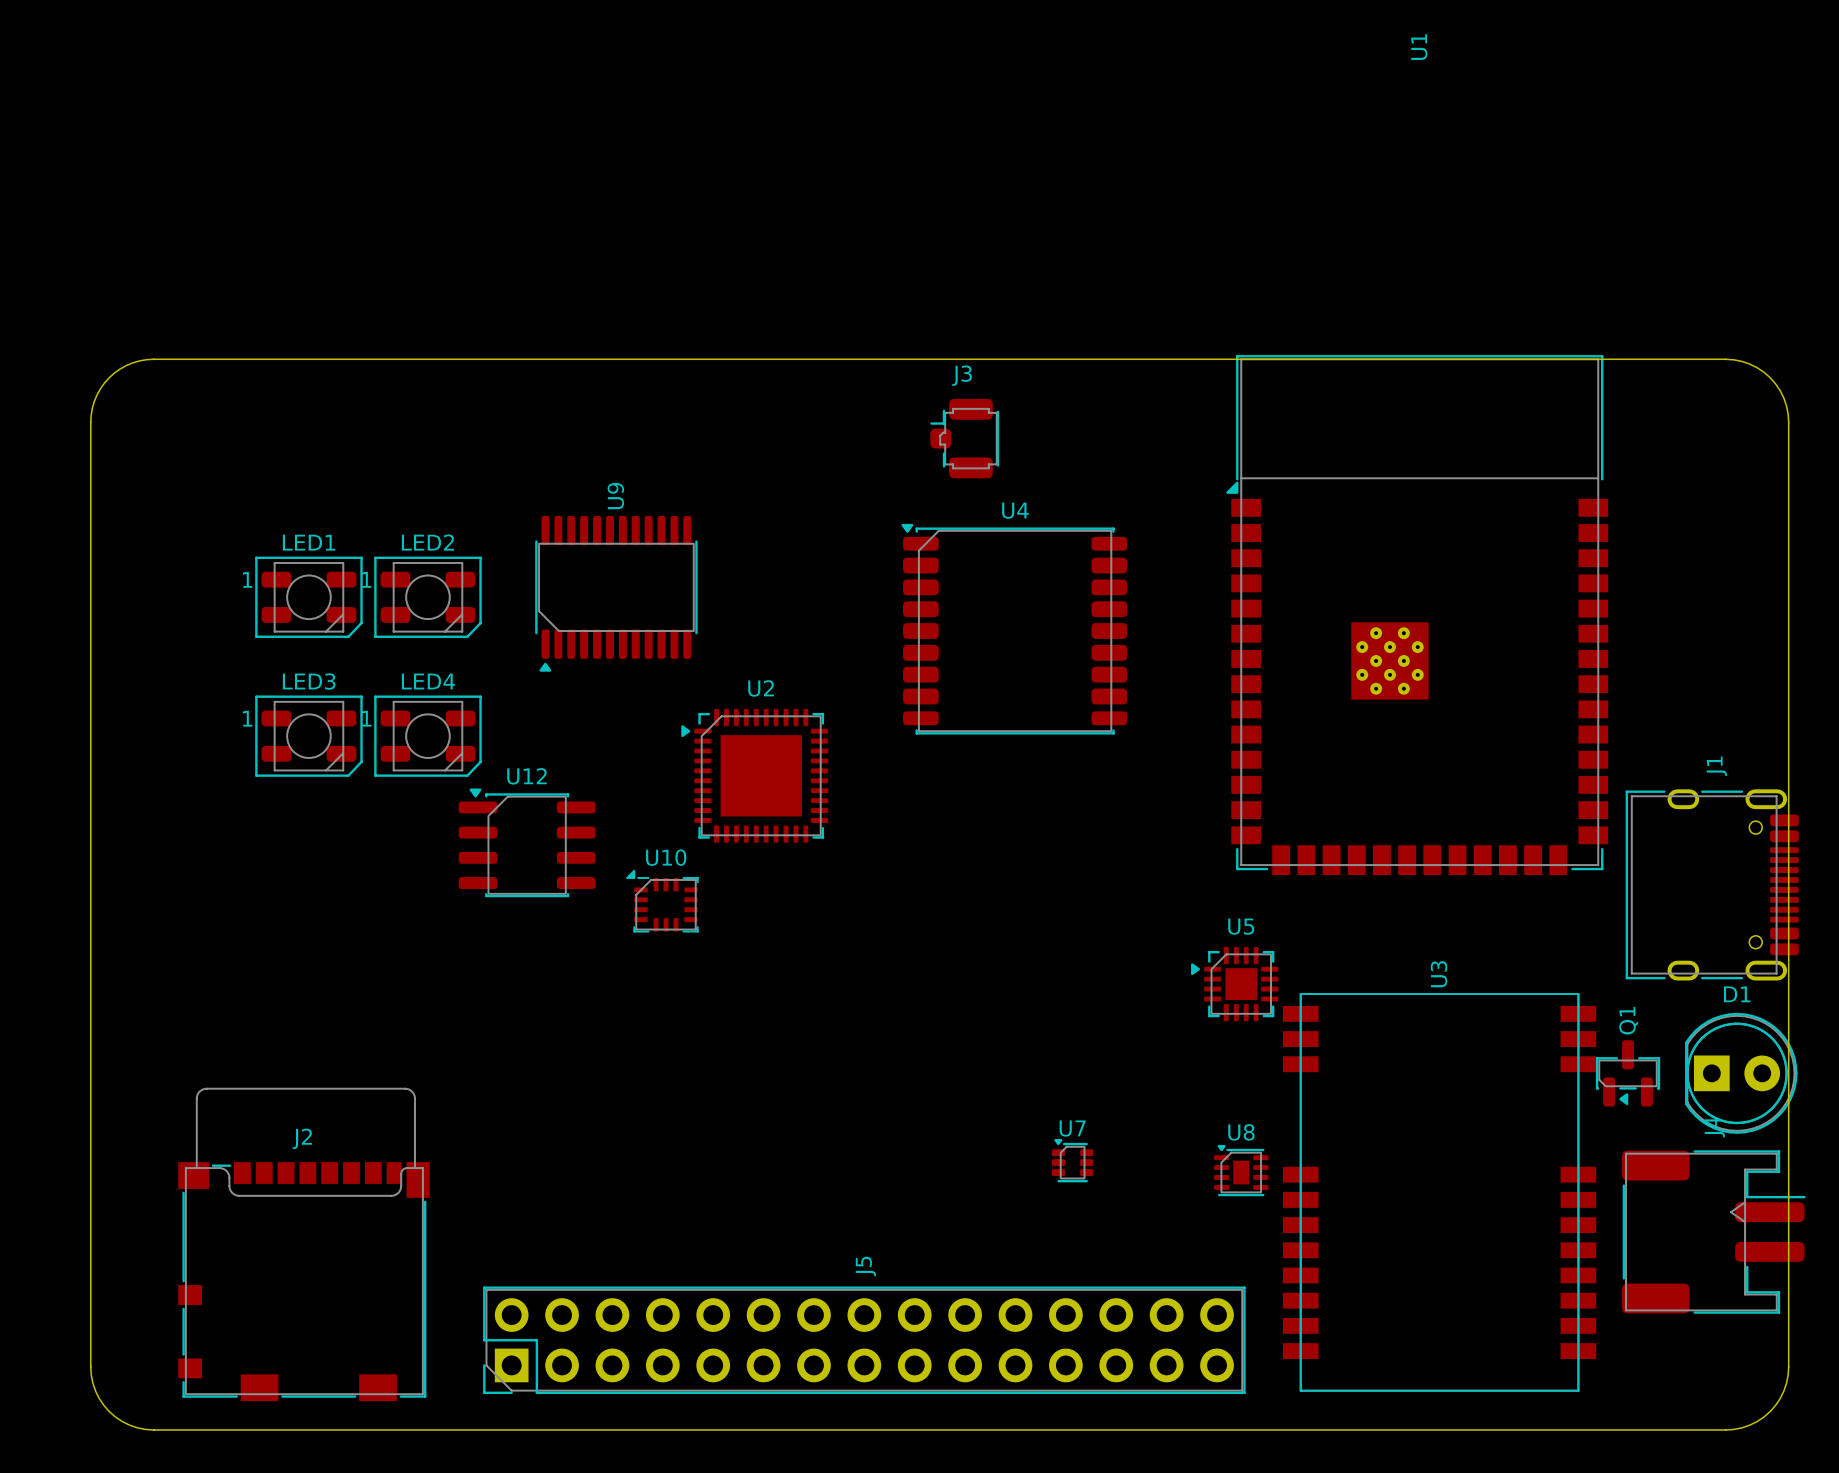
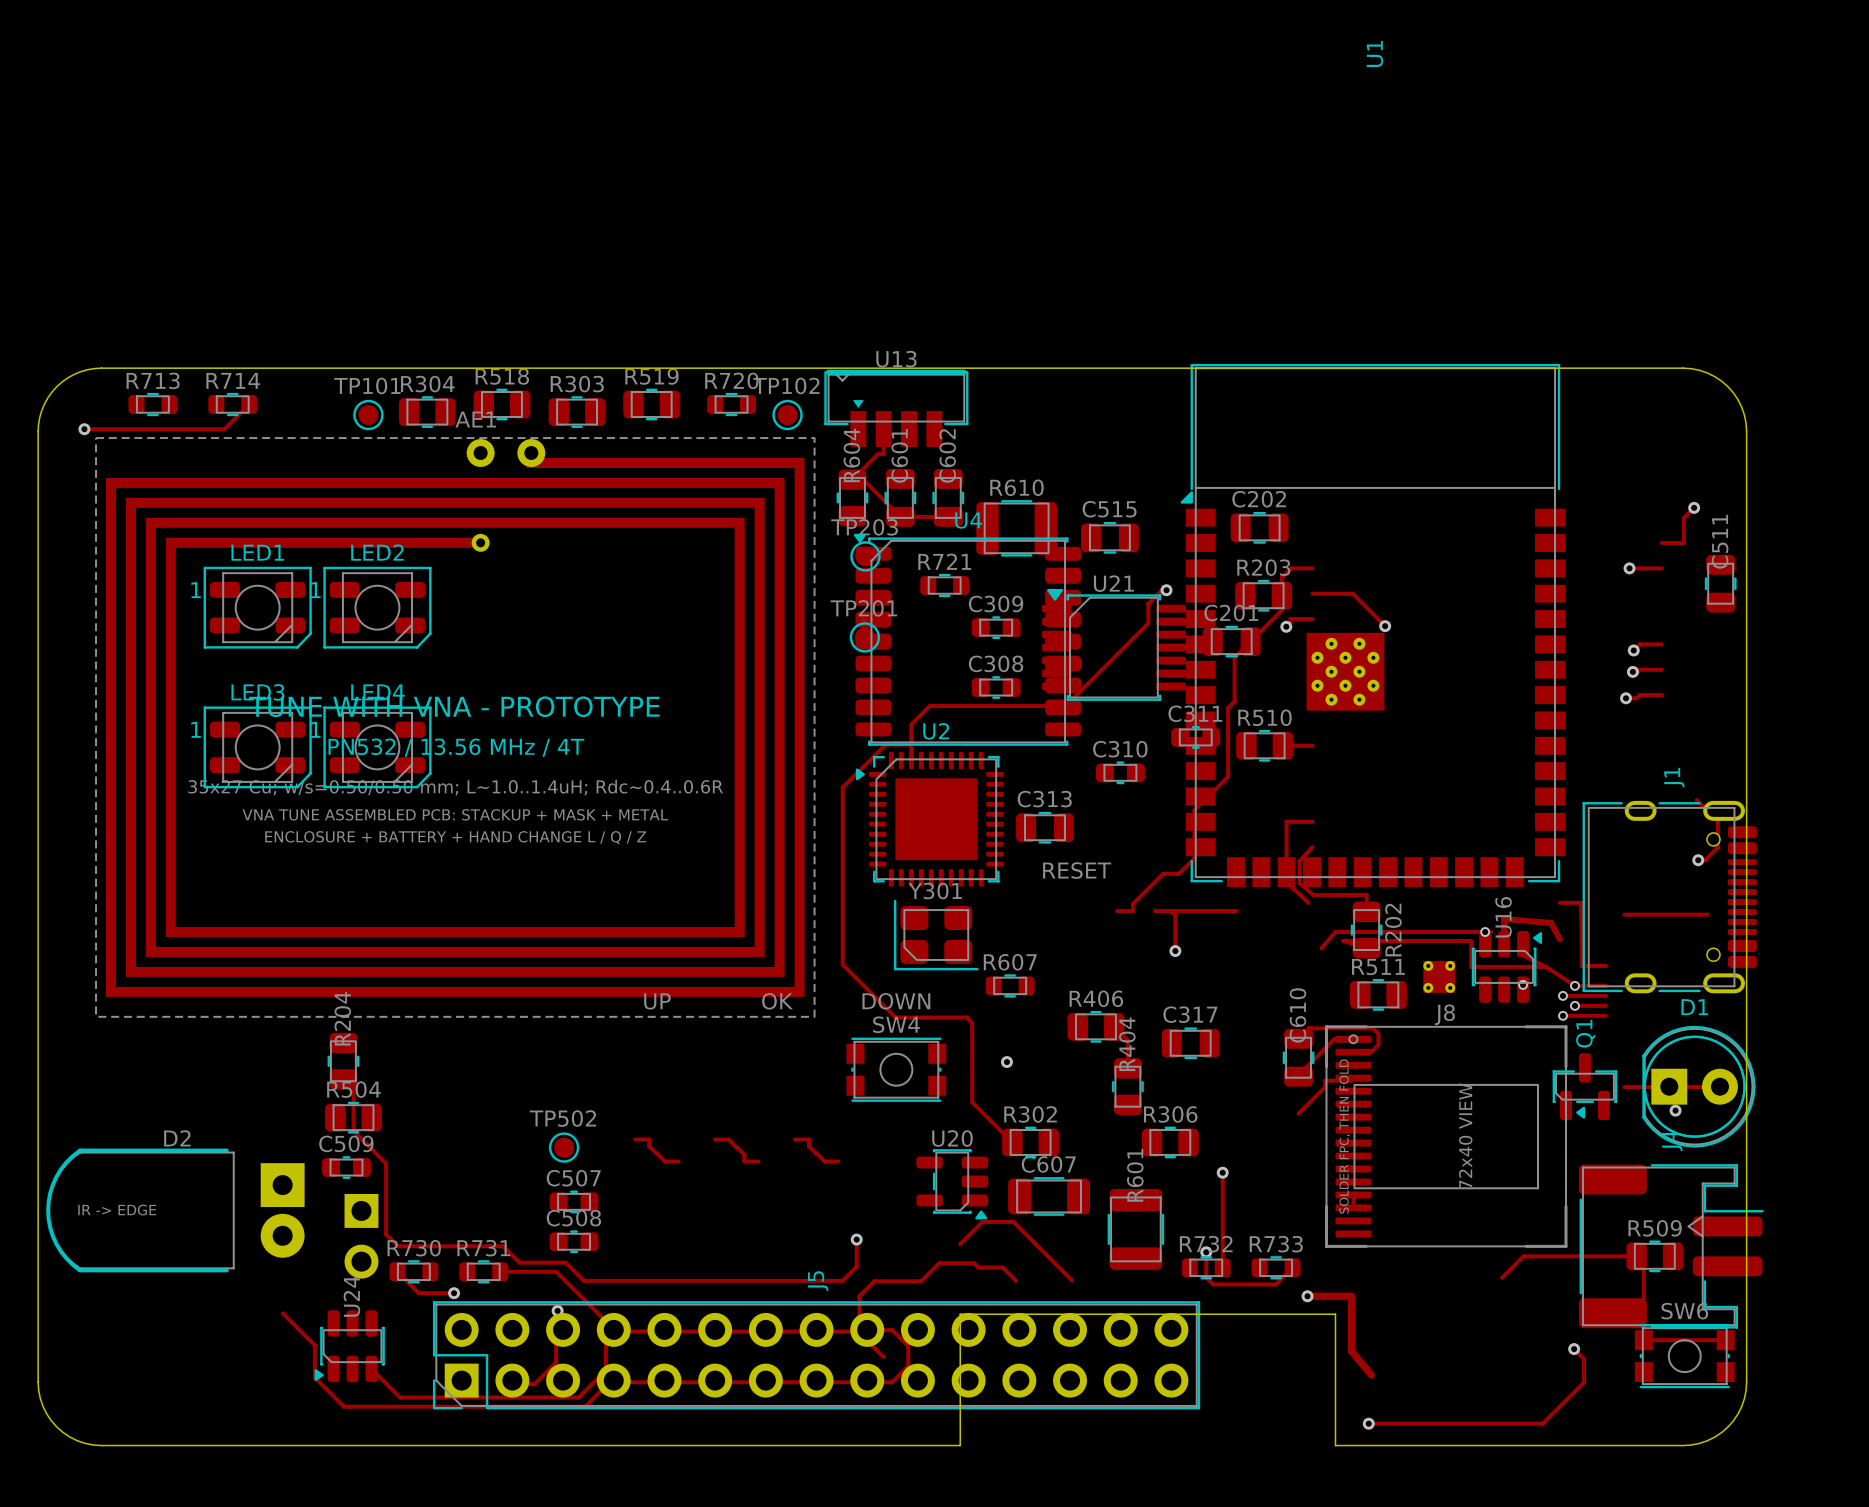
R713: none -> (152, 404)
R714: none -> (232, 404)
track: none -> (249, 404) (224, 429) (84, 429)
R518: none -> (501, 404)
R519: none -> (651, 404)
R720: none -> (731, 404)
U13: none -> (896, 408)
R304: none -> (427, 412)
R303: none -> (577, 412)
TP101: none -> (368, 415)
TP102: none -> (787, 415)
via: none -> (84, 429)
track: none -> (883, 429) (883, 454) (878, 454) (852, 479) (863, 479) (900, 516) (948, 516)
J3: (964, 438) -> none
R604: none -> (852, 497)
C601: none -> (900, 497)
C602: none -> (948, 497)
track: none -> (1694, 507) (1683, 518) (1683, 543) (1661, 543)
via: none -> (1694, 507)
C202: none -> (1259, 527)
R610: none -> (1016, 528)
C515: none -> (1109, 537)
TP203: none -> (865, 556)
track: none -> (1291, 568) (1312, 568)
track: none -> (1291, 568) (1281, 577) (1281, 610) (1234, 657) (1234, 701) (1228, 708) (1228, 776) (1194, 810) (1194, 858) (1178, 873) (1163, 873) (1132, 904) (1132, 911) (1116, 911)
track: none -> (1629, 568) (1661, 568)
via: none -> (1629, 568)
C511: none -> (1720, 583)
R721: none -> (944, 585)
track: none -> (1166, 590) (1162, 590) (1148, 603) (1148, 623) (1065, 705) (929, 705) (911, 724) (911, 760)
via: none -> (1166, 590)
track: none -> (1312, 593) (1352, 593) (1385, 626)
R203: none -> (1263, 595)
U9: (616, 593) -> none
track: none -> (1312, 619) (1290, 619) (1290, 622) (1286, 626)
via: none -> (1385, 626)
via: none -> (1286, 626)
C309: none -> (996, 627)
TP201: none -> (864, 637)
C201: none -> (1231, 641)
track: none -> (1661, 644) (1639, 644) (1633, 650)
U21: none -> (1113, 644)
via: none -> (1633, 650)
track: none -> (1661, 669) (1639, 669) (1632, 671)
via: none -> (1632, 671)
C308: none -> (996, 687)
track: none -> (1661, 695) (1639, 695) (1636, 698) (1626, 698)
via: none -> (1626, 698)
AE1: none -> (455, 727)
C311: none -> (1195, 737)
track: none -> (911, 744) (885, 744) (842, 787) (842, 964) (895, 1017) (966, 1017) (972, 1022) (972, 1102) (1012, 1142)
R510: none -> (1264, 745)
track: none -> (1282, 745) (1312, 745)
C310: none -> (1120, 772)
U2 position: (754, 775) -> (929, 819)
track: none -> (1696, 800) (1717, 821) (1717, 847) (1705, 860) (1698, 860)
track: none -> (1312, 821) (1286, 821) (1286, 883) (1308, 903)
C313: none -> (1044, 827)
track: none -> (1312, 847) (1299, 861) (1299, 883) (1313, 895) (1366, 895) (1366, 911)
U12: (527, 842) -> none
via: none -> (1698, 860)
text: none -> RESET (1077, 870)
track: none -> (1559, 902) (1580, 902) (1581, 965) (1606, 965)
track: none -> (1154, 911) (1236, 911)
track: none -> (1170, 911) (1175, 915) (1175, 951)
U10: (662, 901) -> none
track: none -> (1624, 914) (1707, 914)
R202: none -> (1366, 930)
via: none -> (1485, 932)
track: none -> (1491, 932) (1335, 932) (1321, 948)
Y301: none -> (936, 935)
track: none -> (1559, 939) (1551, 923) (1504, 919) (1504, 944)
track: none -> (1366, 948) (1343, 941) (1471, 941) (1471, 966) (1546, 966)
via: none -> (1175, 951)
track: none -> (1524, 955) (1546, 966)
U16: none -> (1506, 966)
track: none -> (1546, 966) (1574, 985) (1606, 985)
part: none -> (1439, 976)
via: none -> (1523, 984)
R607: none -> (1010, 985)
via: none -> (1574, 985)
R511: none -> (1378, 994)
track: none -> (1563, 995) (1606, 995)
via: none -> (1563, 995)
U5: (1234, 984) -> none
text: none -> UP (657, 1001)
text: none -> OK (777, 1001)
text: none -> DOWN (896, 1001)
track: none -> (1574, 1005) (1606, 1005)
via: none -> (1574, 1005)
track: none -> (1563, 1015) (1606, 1015)
via: none -> (1563, 1015)
R406: none -> (1095, 1026)
track: none -> (1114, 1026) (1127, 1040) (1127, 1068)
track: none -> (1298, 1038) (1309, 1028) (1373, 1028) (1378, 1033) (1378, 1044) (1371, 1052) (1353, 1052)
track: none -> (1353, 1039) (1334, 1039) (1298, 1076)
C317: none -> (1190, 1043)
C610: none -> (1298, 1057)
R204: none -> (343, 1061)
via: none -> (1006, 1062)
SW4: none -> (896, 1069)
track: none -> (1353, 1078) (1350, 1080) (1325, 1080) (1325, 1086) (1298, 1113)
track: none -> (343, 1079) (353, 1089) (353, 1131) (386, 1163) (386, 1234) (397, 1246) (503, 1246) (519, 1262) (565, 1262) (583, 1280) (842, 1280) (856, 1266) (856, 1239)
R404: none -> (1127, 1086)
track: none -> (1624, 1087) (1707, 1087)
via: none -> (1675, 1110)
R504: none -> (353, 1117)
J8: none -> (1446, 1136)
track: none -> (635, 1139) (649, 1139) (649, 1146) (665, 1161) (678, 1161)
track: none -> (715, 1139) (728, 1139) (744, 1154) (744, 1161) (758, 1161)
track: none -> (794, 1139) (808, 1139) (808, 1146) (824, 1161) (838, 1161)
R302: none -> (1030, 1142)
R306: none -> (1170, 1142)
TP502: none -> (564, 1147)
C509: none -> (346, 1167)
track: none -> (1222, 1172) (1222, 1267)
via: none -> (1222, 1172)
U7: (1072, 1160) -> none
U20: none -> (952, 1184)
U8: (1241, 1170) -> none
track: none -> (1353, 1194) (1353, 1207)
C607: none -> (1049, 1196)
C507: none -> (574, 1201)
U3: (1439, 1192) -> none
D2: none -> (175, 1210)
R601: none -> (1135, 1229)
part: none -> (361, 1236)
via: none -> (856, 1239)
C508: none -> (574, 1241)
track: none -> (960, 1244) (982, 1221) (1013, 1221) (1072, 1280)
track: none -> (1206, 1252) (1206, 1277) (1213, 1284) (1275, 1284) (1292, 1267)
via: none -> (1206, 1252)
R509: none -> (1654, 1256)
J2: (303, 1244) -> none
R732: none -> (1206, 1267)
R733: none -> (1276, 1267)
track: none -> (397, 1271) (418, 1293) (454, 1293)
R730: none -> (413, 1271)
R731: none -> (483, 1271)
track: none -> (500, 1271) (556, 1271) (617, 1333)
track: none -> (1502, 1277) (1523, 1256) (1636, 1256) (1643, 1263) (1643, 1340) (1725, 1340)
track: none -> (1016, 1281) (1002, 1267) (978, 1267) (974, 1263) (939, 1263) (921, 1281) (874, 1281) (859, 1296) (859, 1316) (873, 1330) (892, 1330) (908, 1346) (908, 1366) (892, 1382) (609, 1382) (585, 1406) (343, 1406) (314, 1377) (314, 1345) (282, 1313)
via: none -> (454, 1293)
track: none -> (1307, 1296) (1351, 1296) (1351, 1351) (1371, 1375)
via: none -> (1307, 1296)
track: none -> (557, 1310) (556, 1362) (534, 1384) (526, 1384)
via: none -> (557, 1310)
U24: none -> (349, 1346)
track: none -> (1574, 1349) (1584, 1358) (1584, 1382) (1542, 1423) (1368, 1423)
via: none -> (1574, 1349)
track: none -> (883, 1356) (858, 1331) (619, 1331) (605, 1345) (605, 1370) (578, 1397) (400, 1397) (371, 1368)
SW6: none -> (1684, 1356)
via: none -> (1368, 1423)
board edge: (1007, 1429) (1380, 1429) -> (960, 1445) (960, 1314) (1335, 1314) (1335, 1445)

